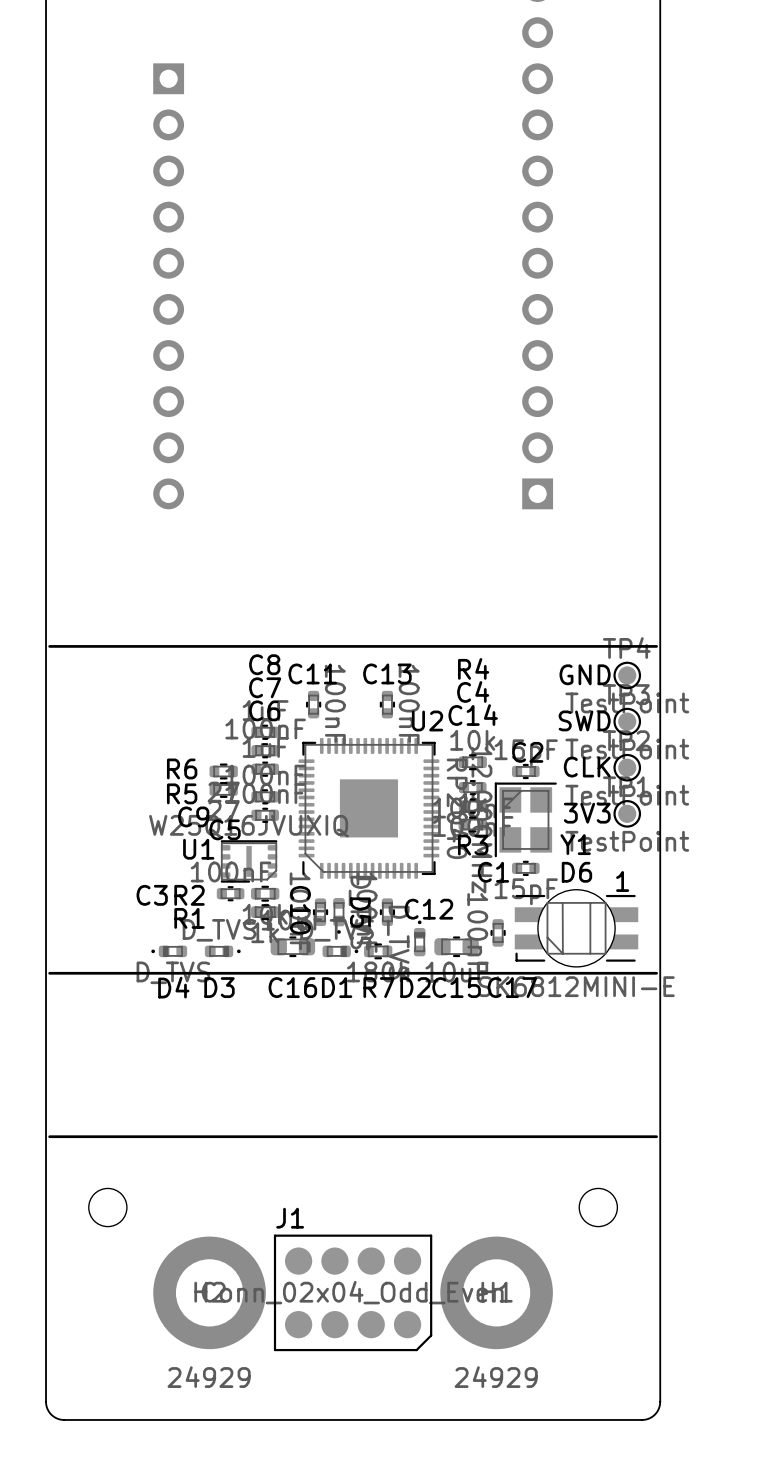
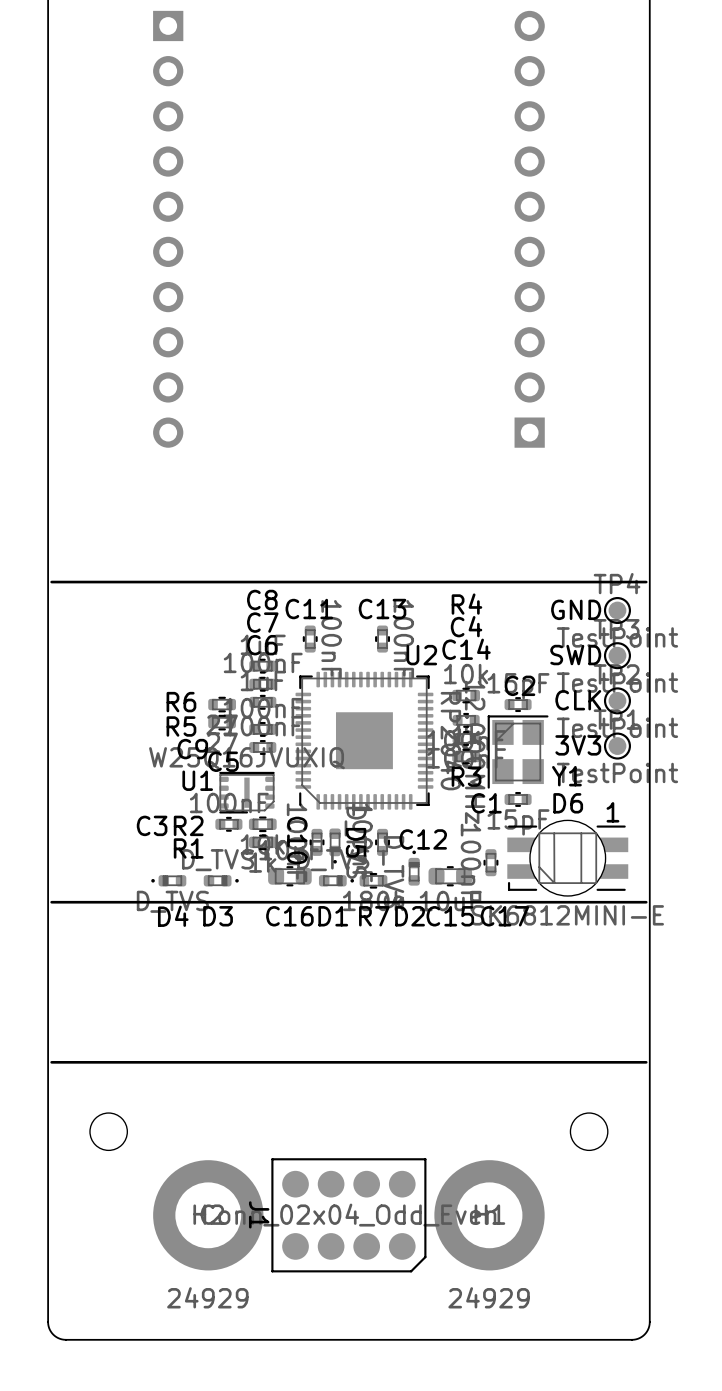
J1 name rotation: 0° (290, 1218) -> 90° clockwise (259, 1214)
J1 name position: J1 (290, 1218) -> J1 (259, 1214)

